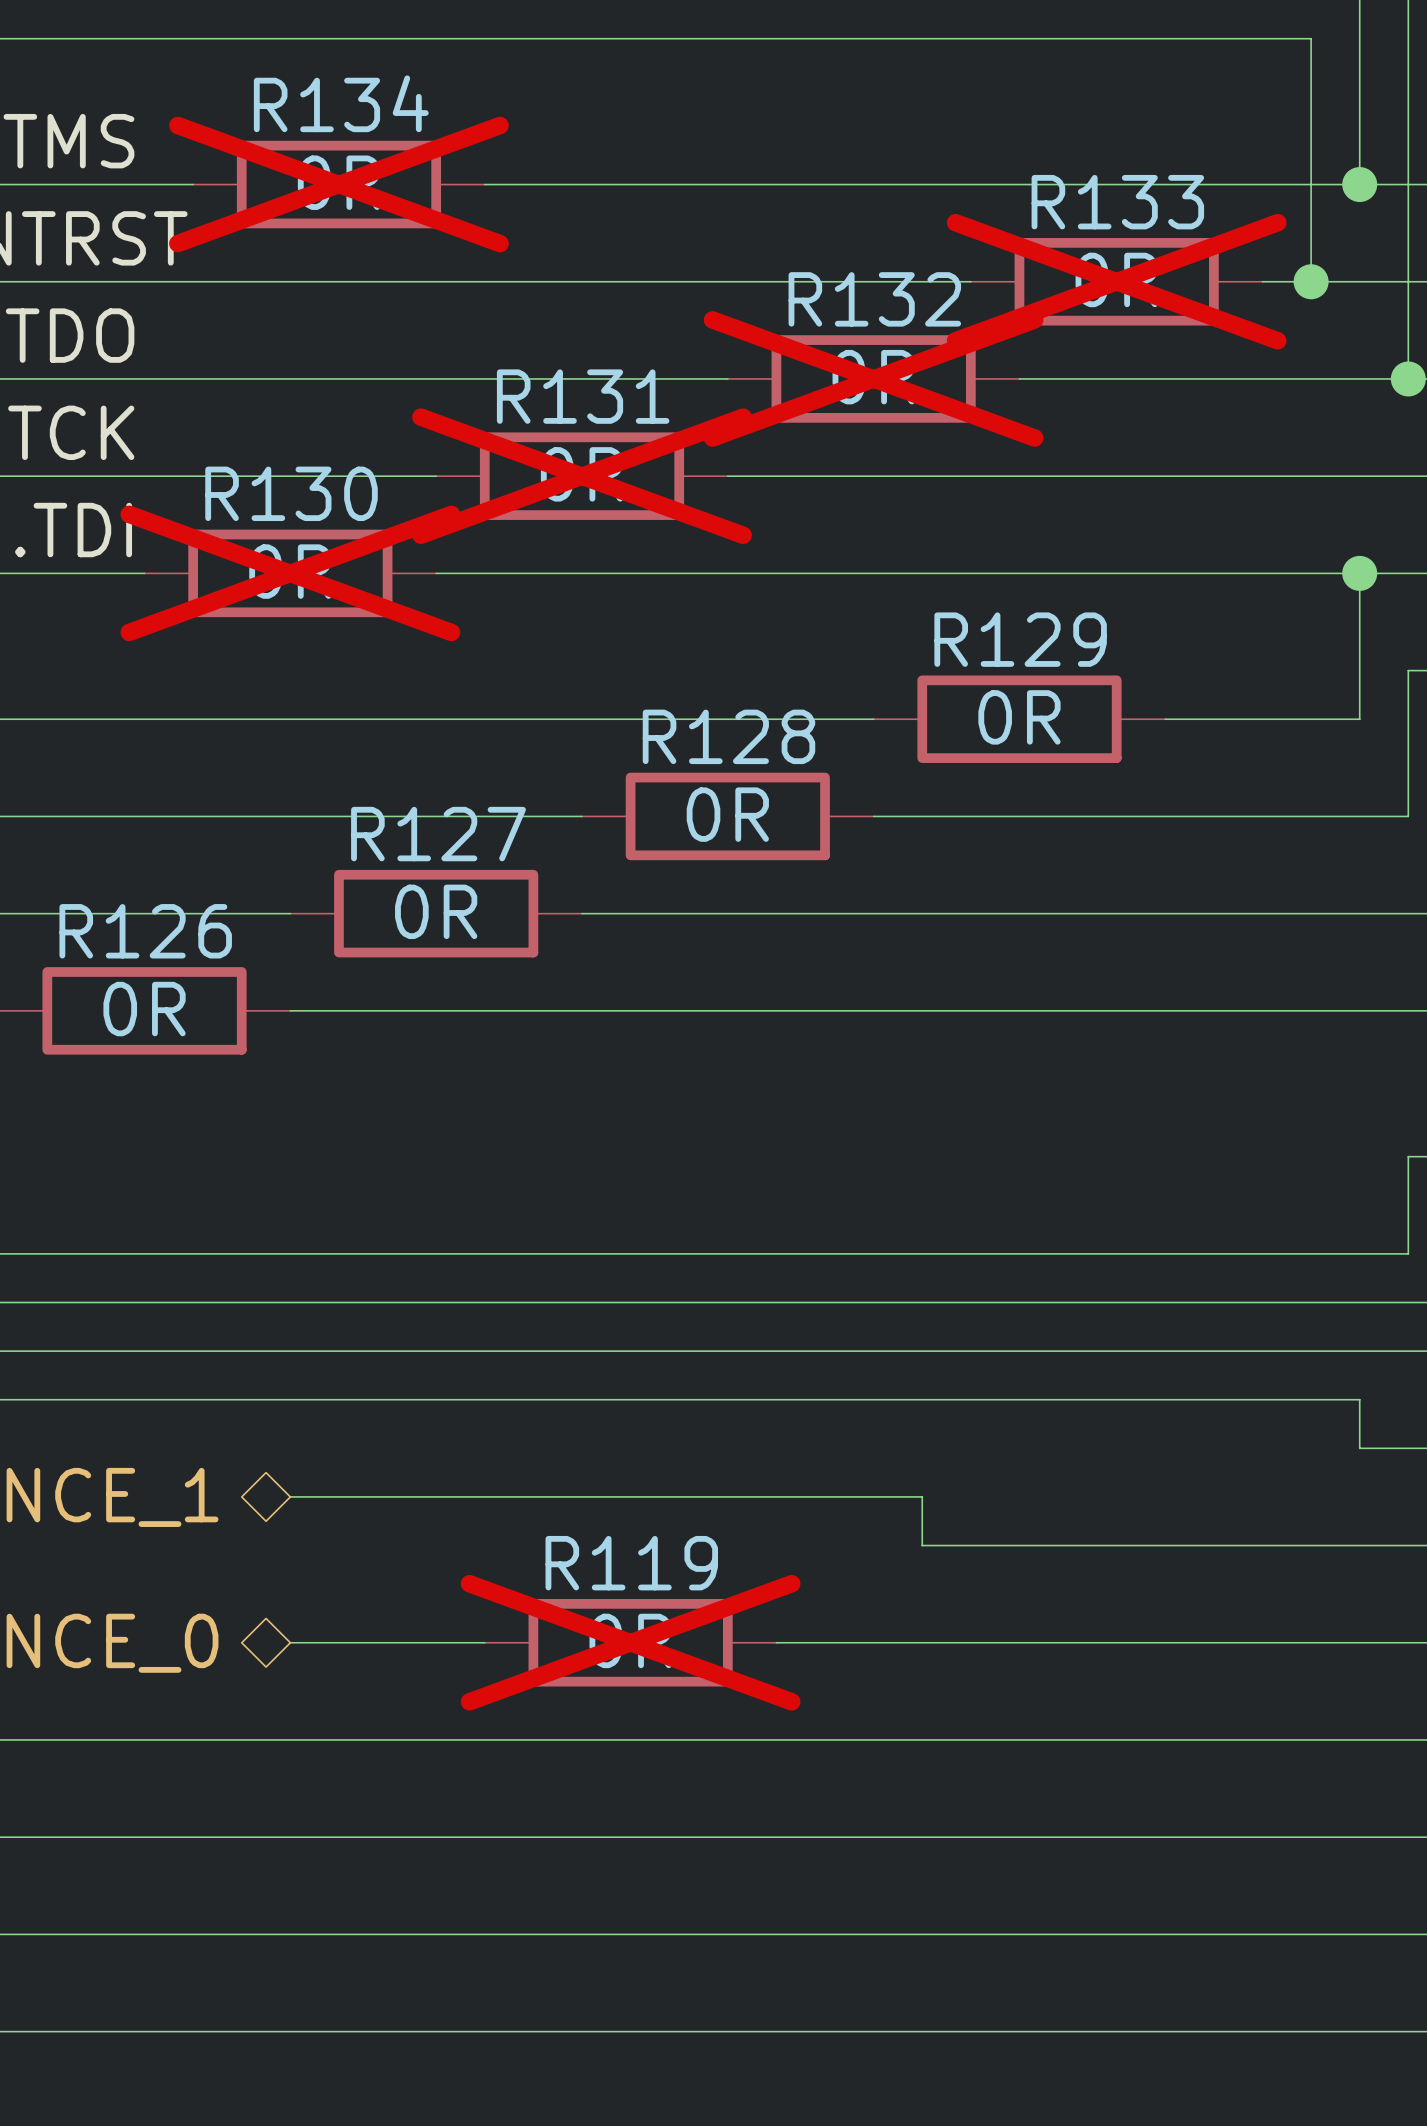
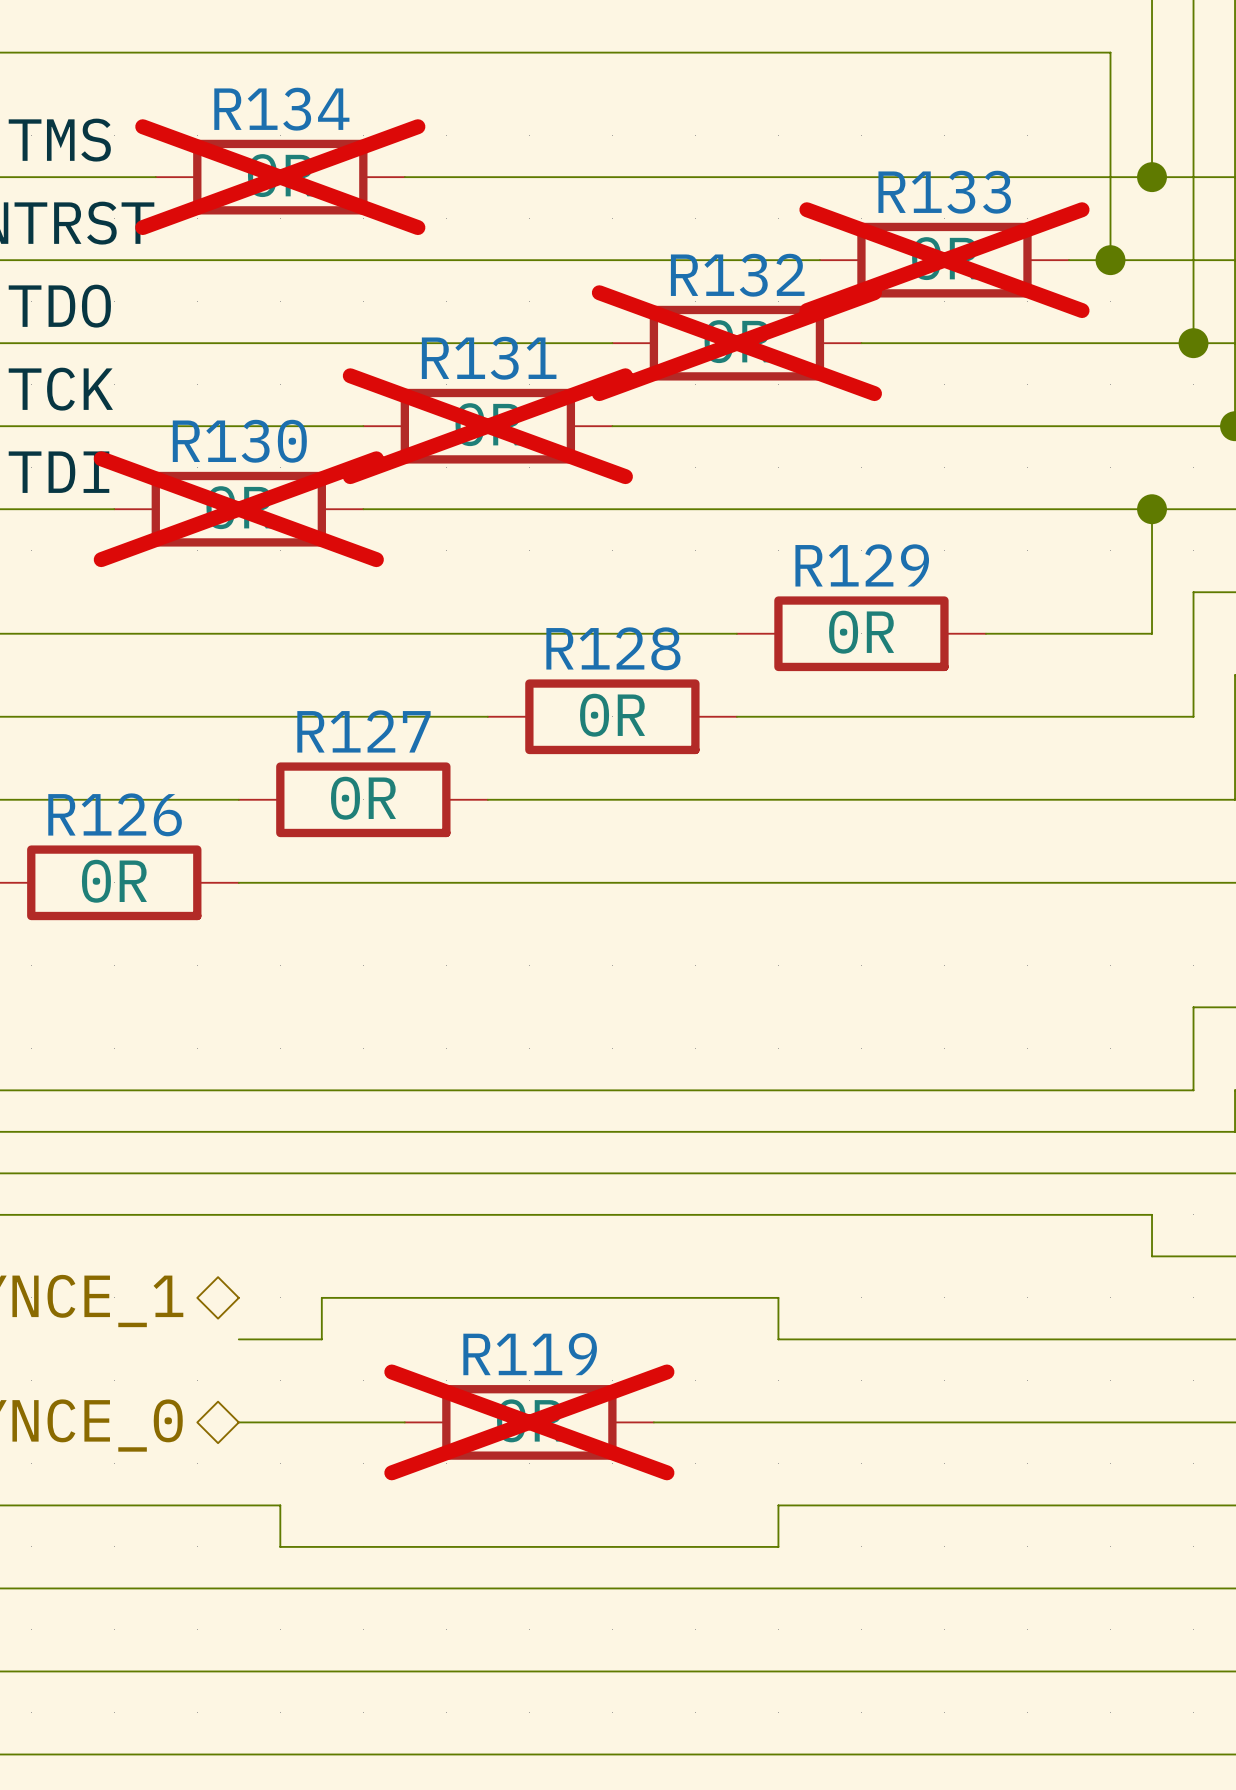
wire: (290, 1496) (387, 1496) -> (238, 1339) (321, 1339) (321, 1297)
wire: (338, 1739) (922, 1739) -> (280, 1505) (280, 1546) (778, 1546) (778, 1505)

